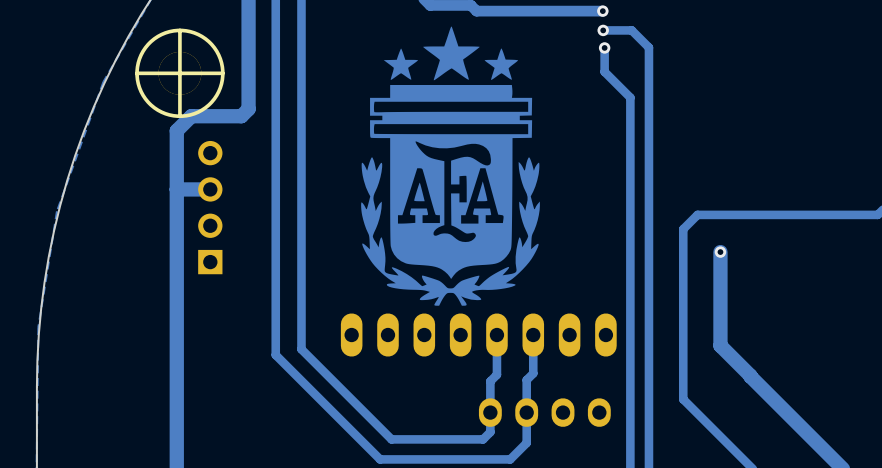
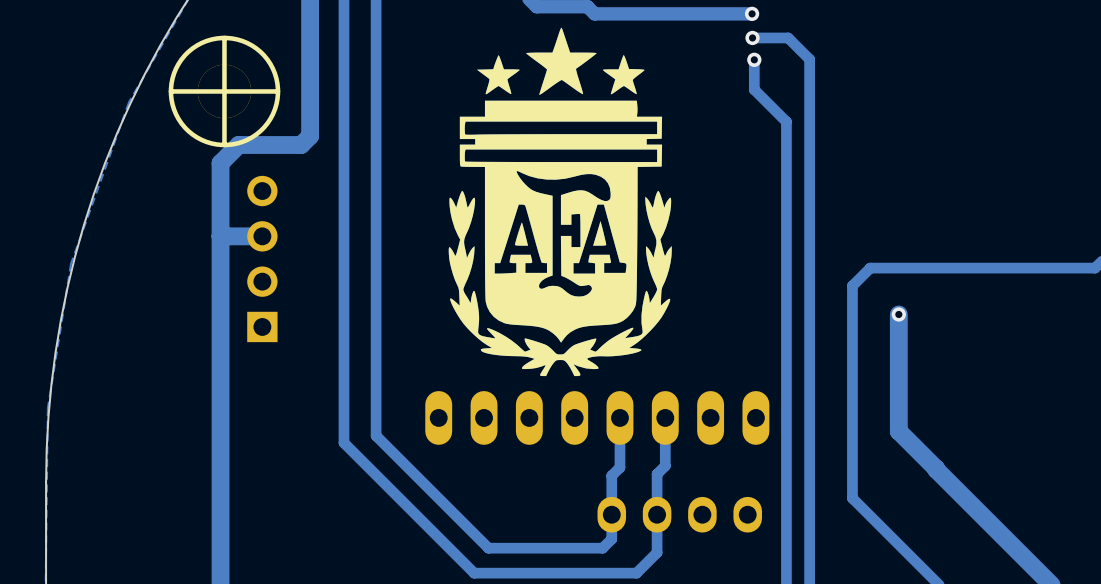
drawing shape: [361, 26, 540, 306] -> [448, 27, 672, 377]

